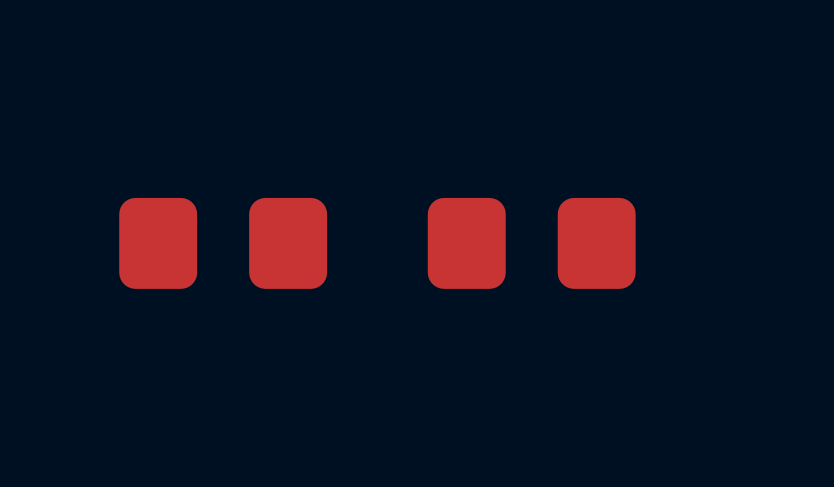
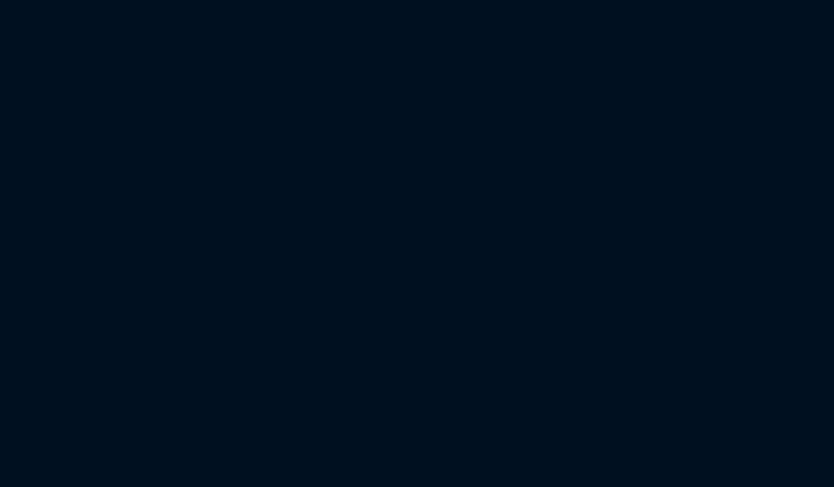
part: (223, 243) -> none
part: (531, 243) -> none

